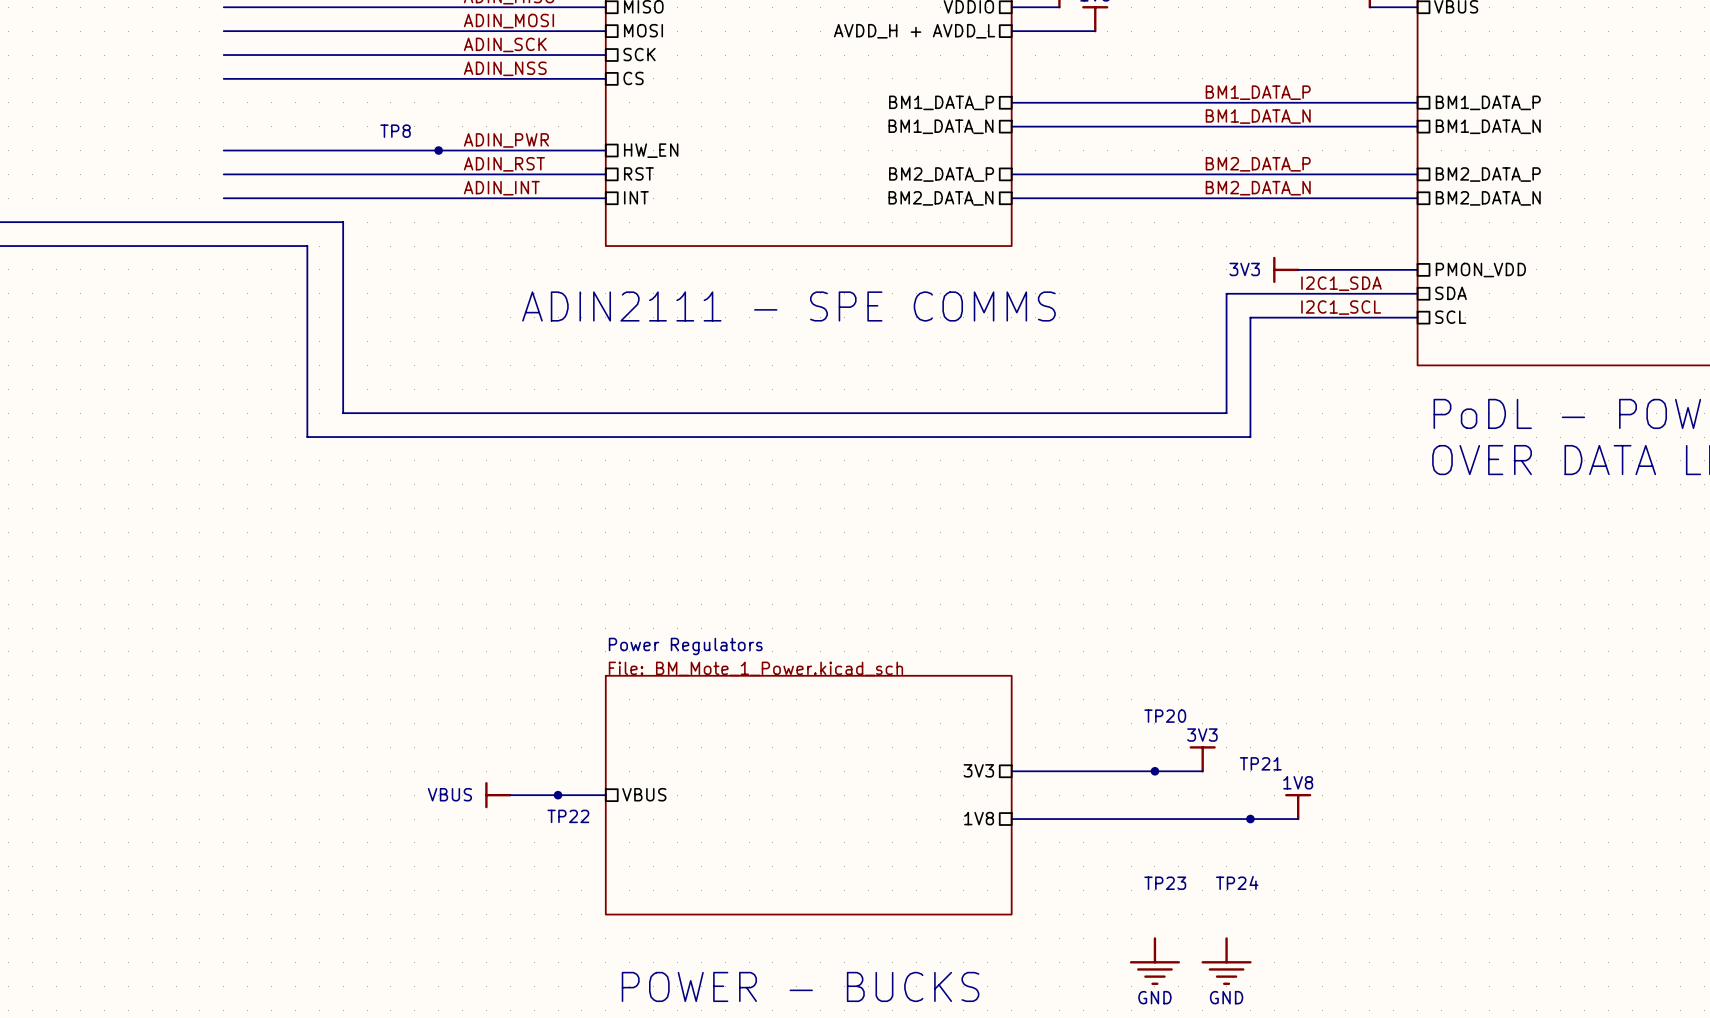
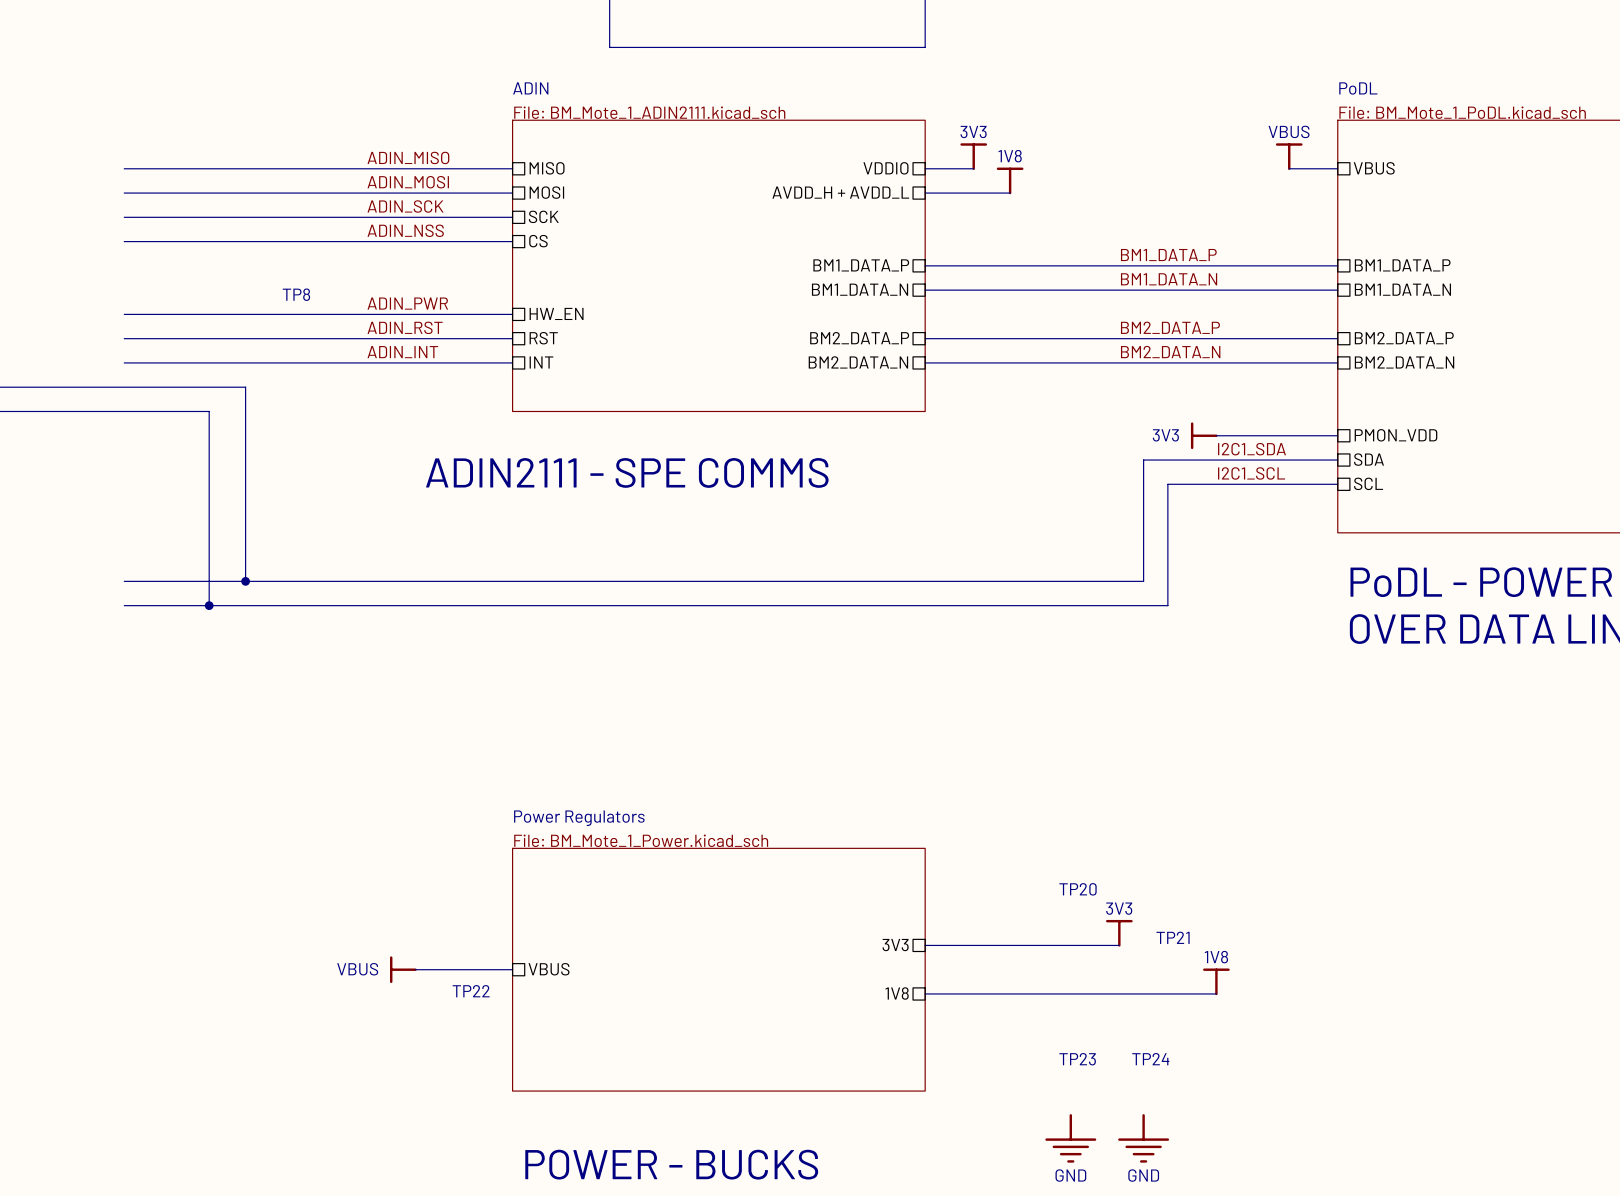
junction: (438, 150) -> none
wire: none -> (124, 581) (245, 581)
junction: none -> (245, 581)
wire: none -> (124, 605) (209, 605)
junction: none -> (209, 605)
junction: (1154, 771) -> none
junction: (558, 795) -> none
junction: (1250, 819) -> none

